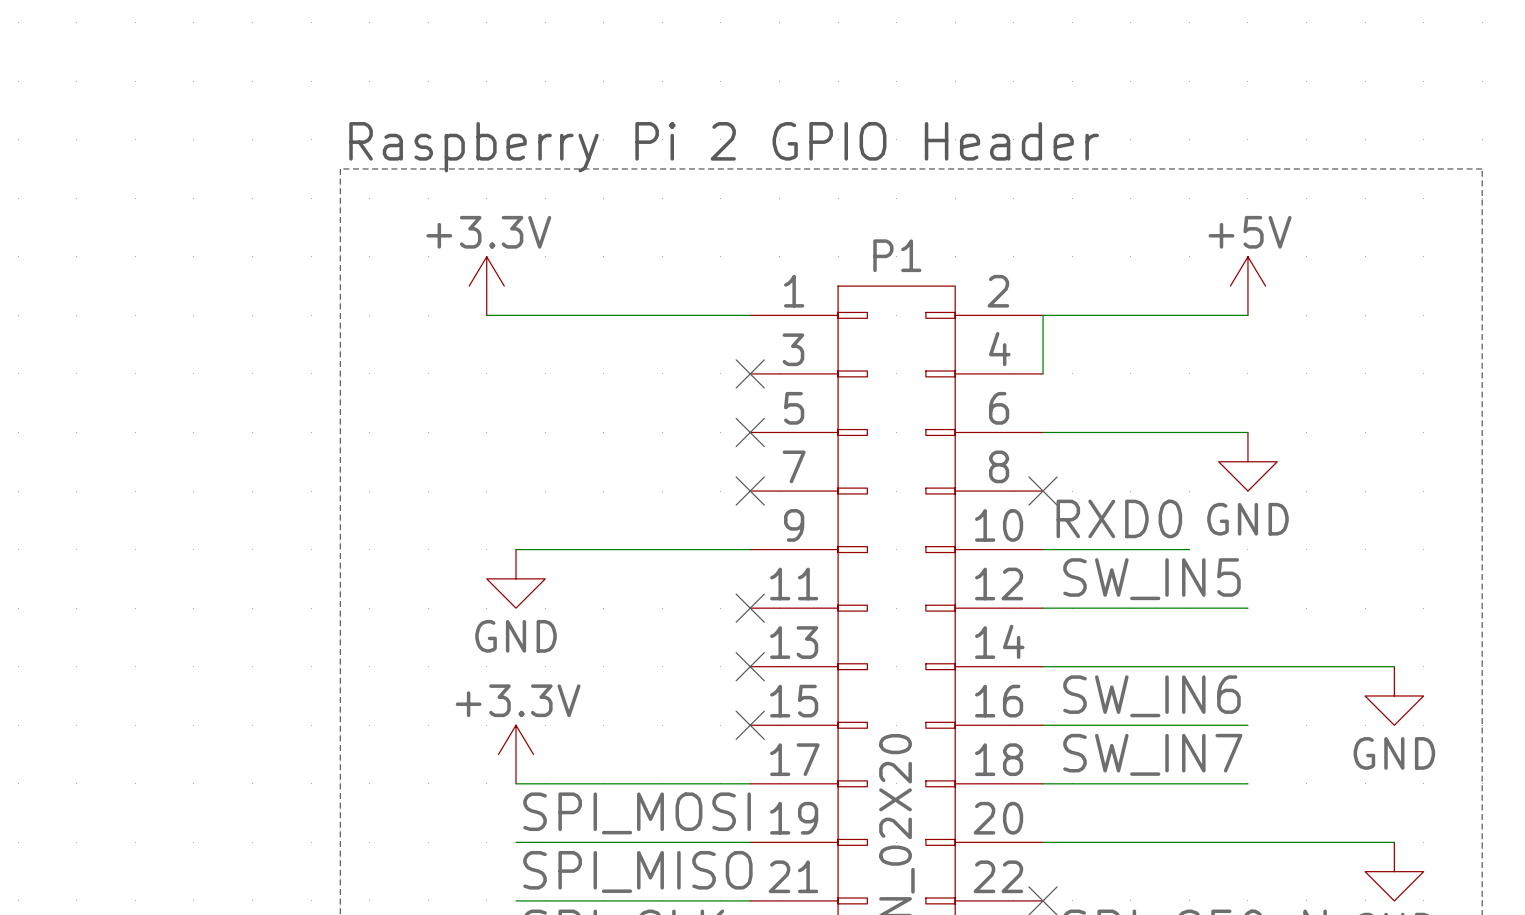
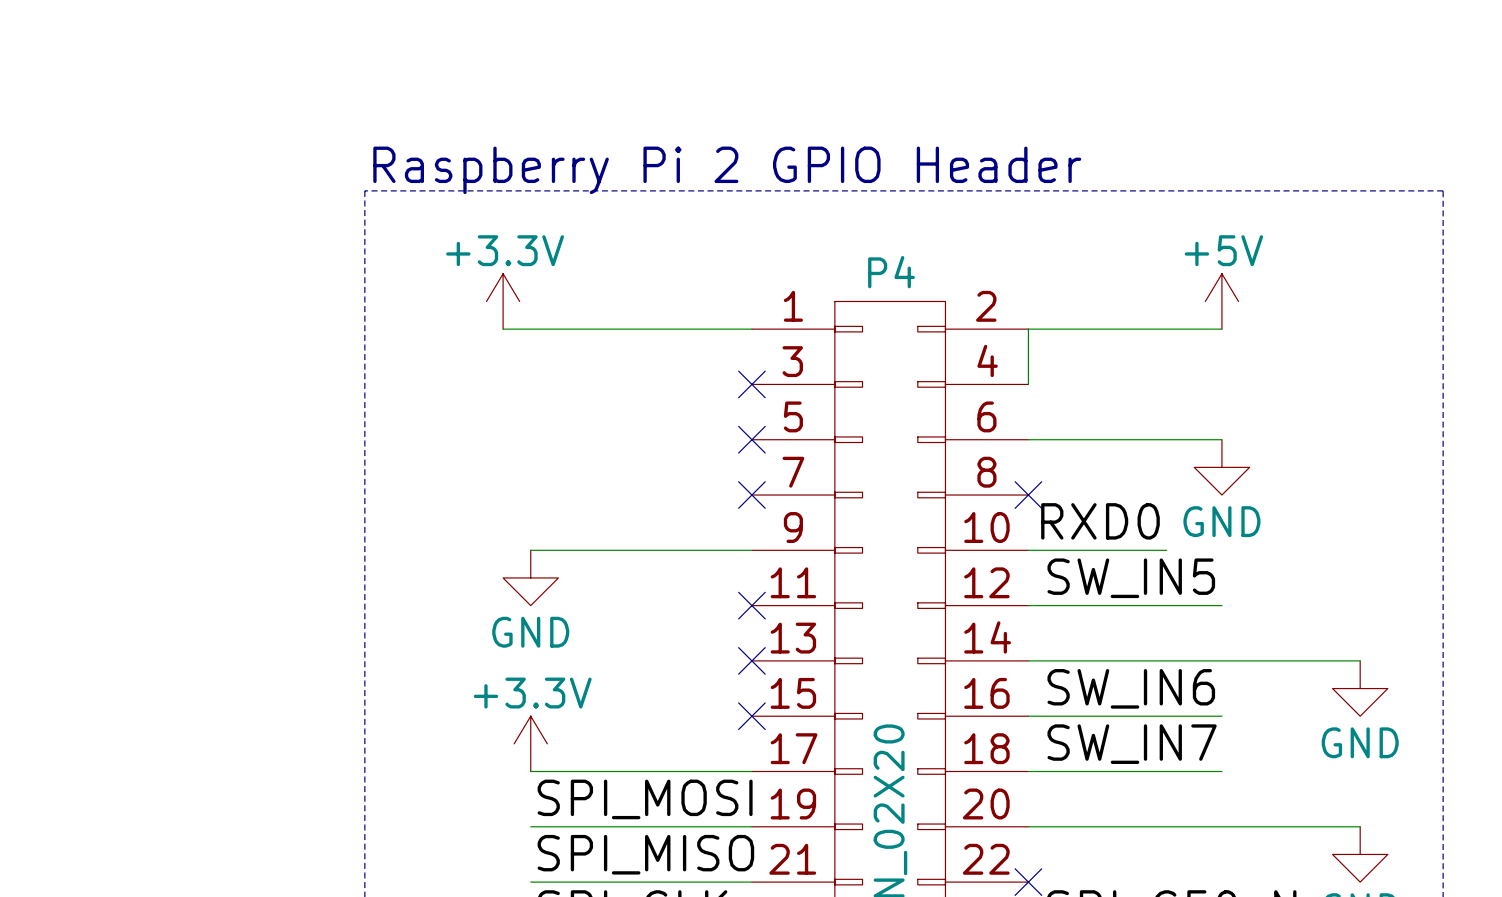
P1 name: P1 (897, 255) -> P4 (891, 272)

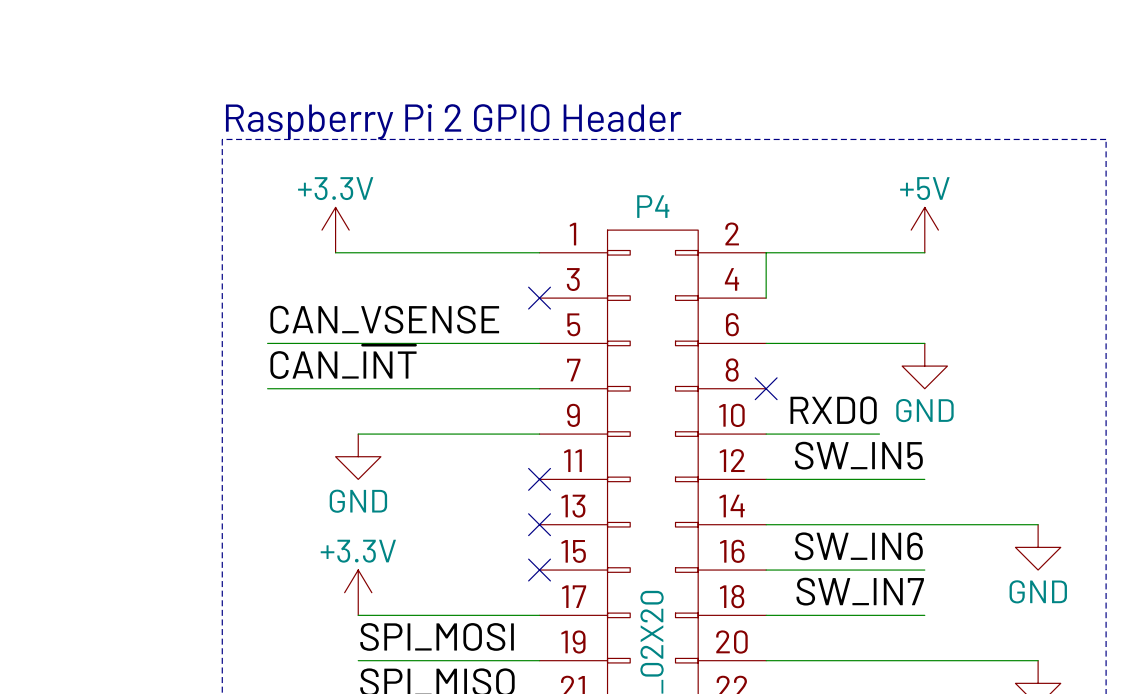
label: none -> CAN_VSENSE (384, 319)
wire: none -> (267, 343) (539, 343)
no-connect mark: (751, 439) -> none
label: none -> CAN_~{INT} (343, 362)
wire: none -> (267, 388) (539, 388)
no-connect mark: (751, 495) -> none

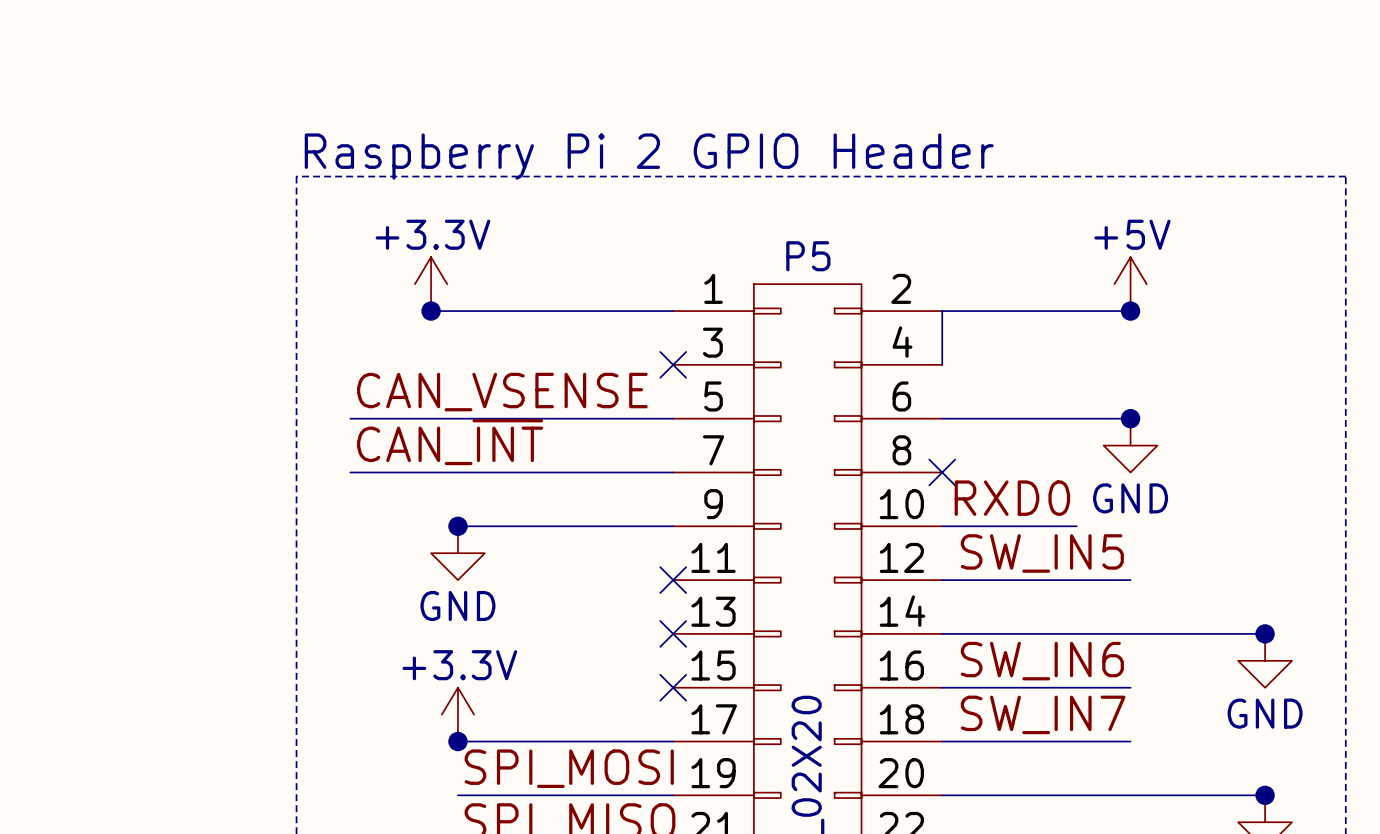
P4 name: P4 (653, 206) -> P5 (808, 256)
junction: none -> (431, 311)
junction: none -> (1130, 311)
junction: none -> (1130, 418)
junction: none -> (457, 526)
junction: none -> (1265, 633)
junction: none -> (457, 741)
junction: none -> (1265, 795)

